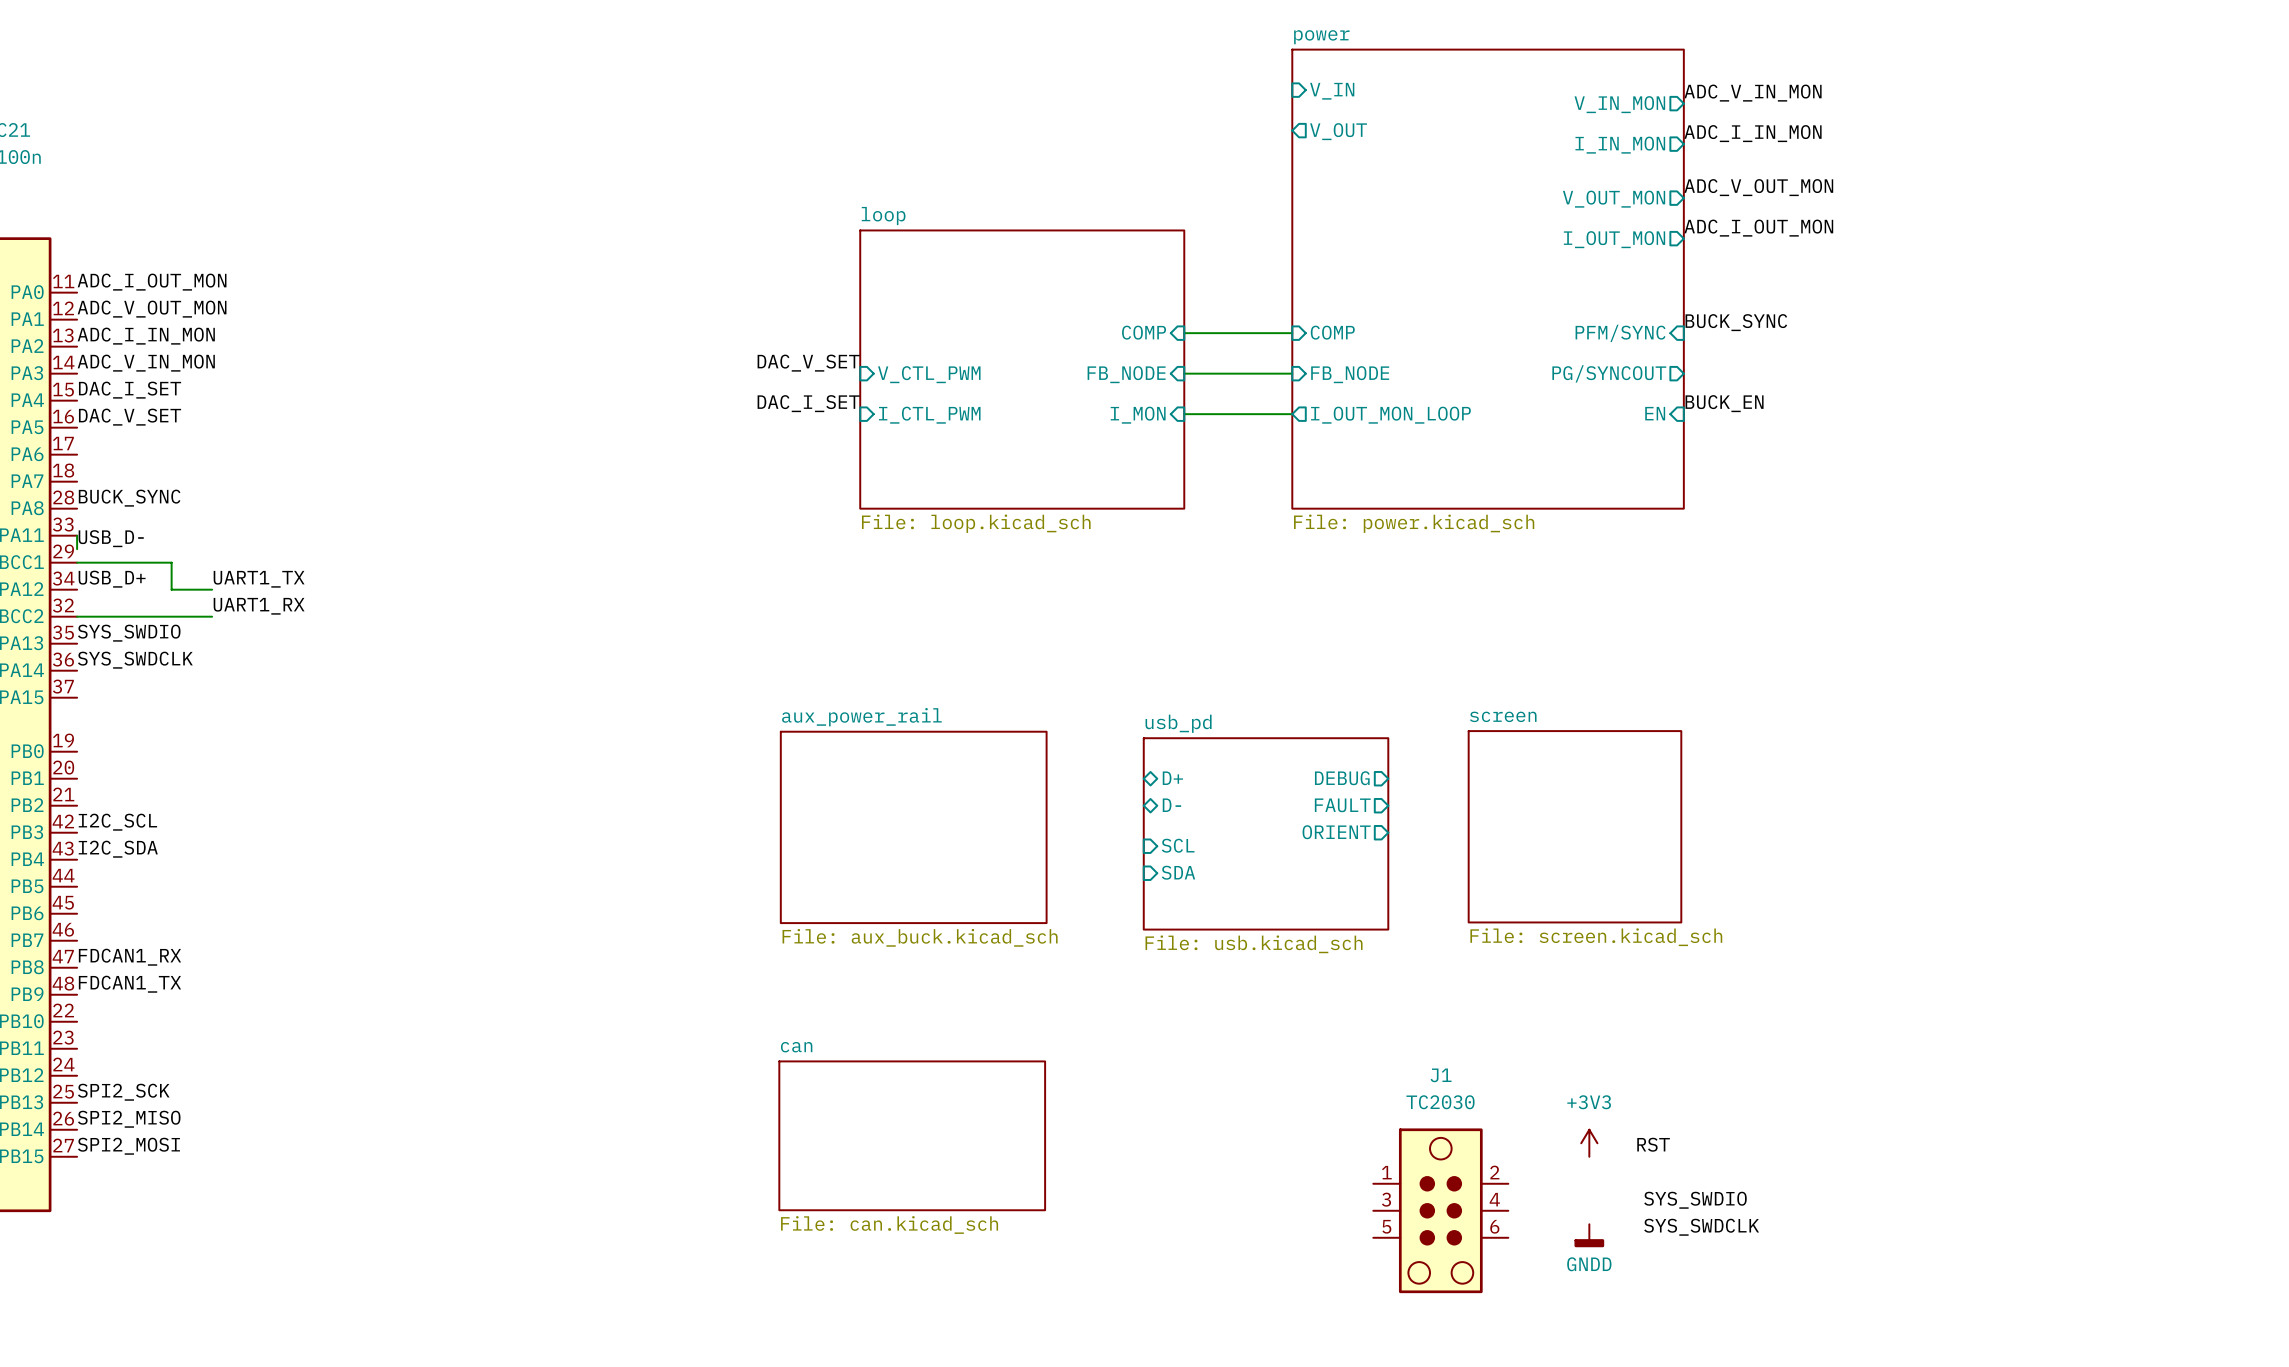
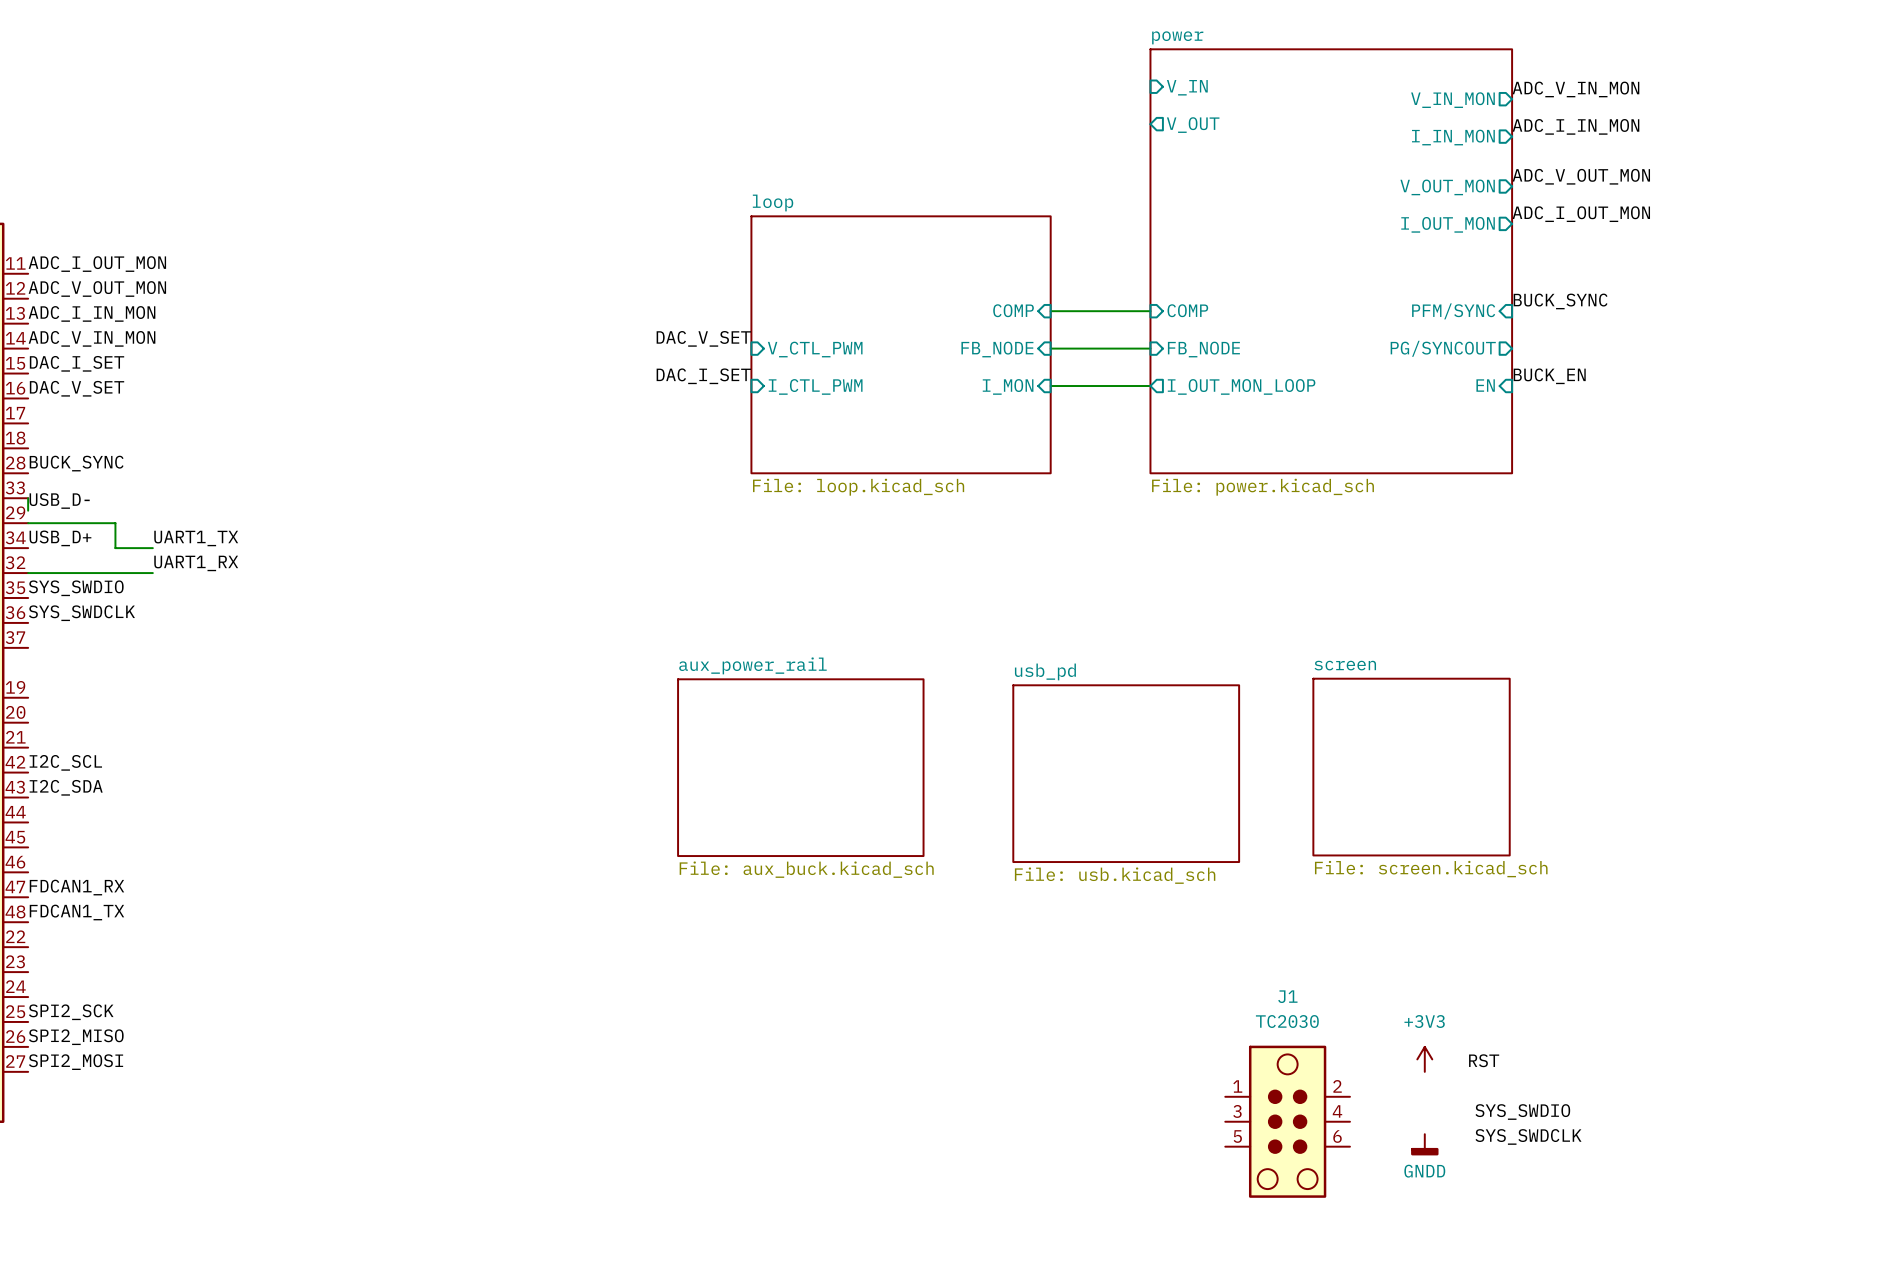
sheet pin: D+ (1172, 778) -> none
sheet pin: DEBUG (1342, 778) -> none
sheet pin: D- (1171, 805) -> none
sheet pin: FAULT (1342, 805) -> none
sheet pin: ORIENT (1336, 832) -> none
sheet pin: SCL (1178, 845) -> none
sheet pin: SDA (1178, 872) -> none
sheet can: File: can.kicad_sch (912, 1135) -> none

